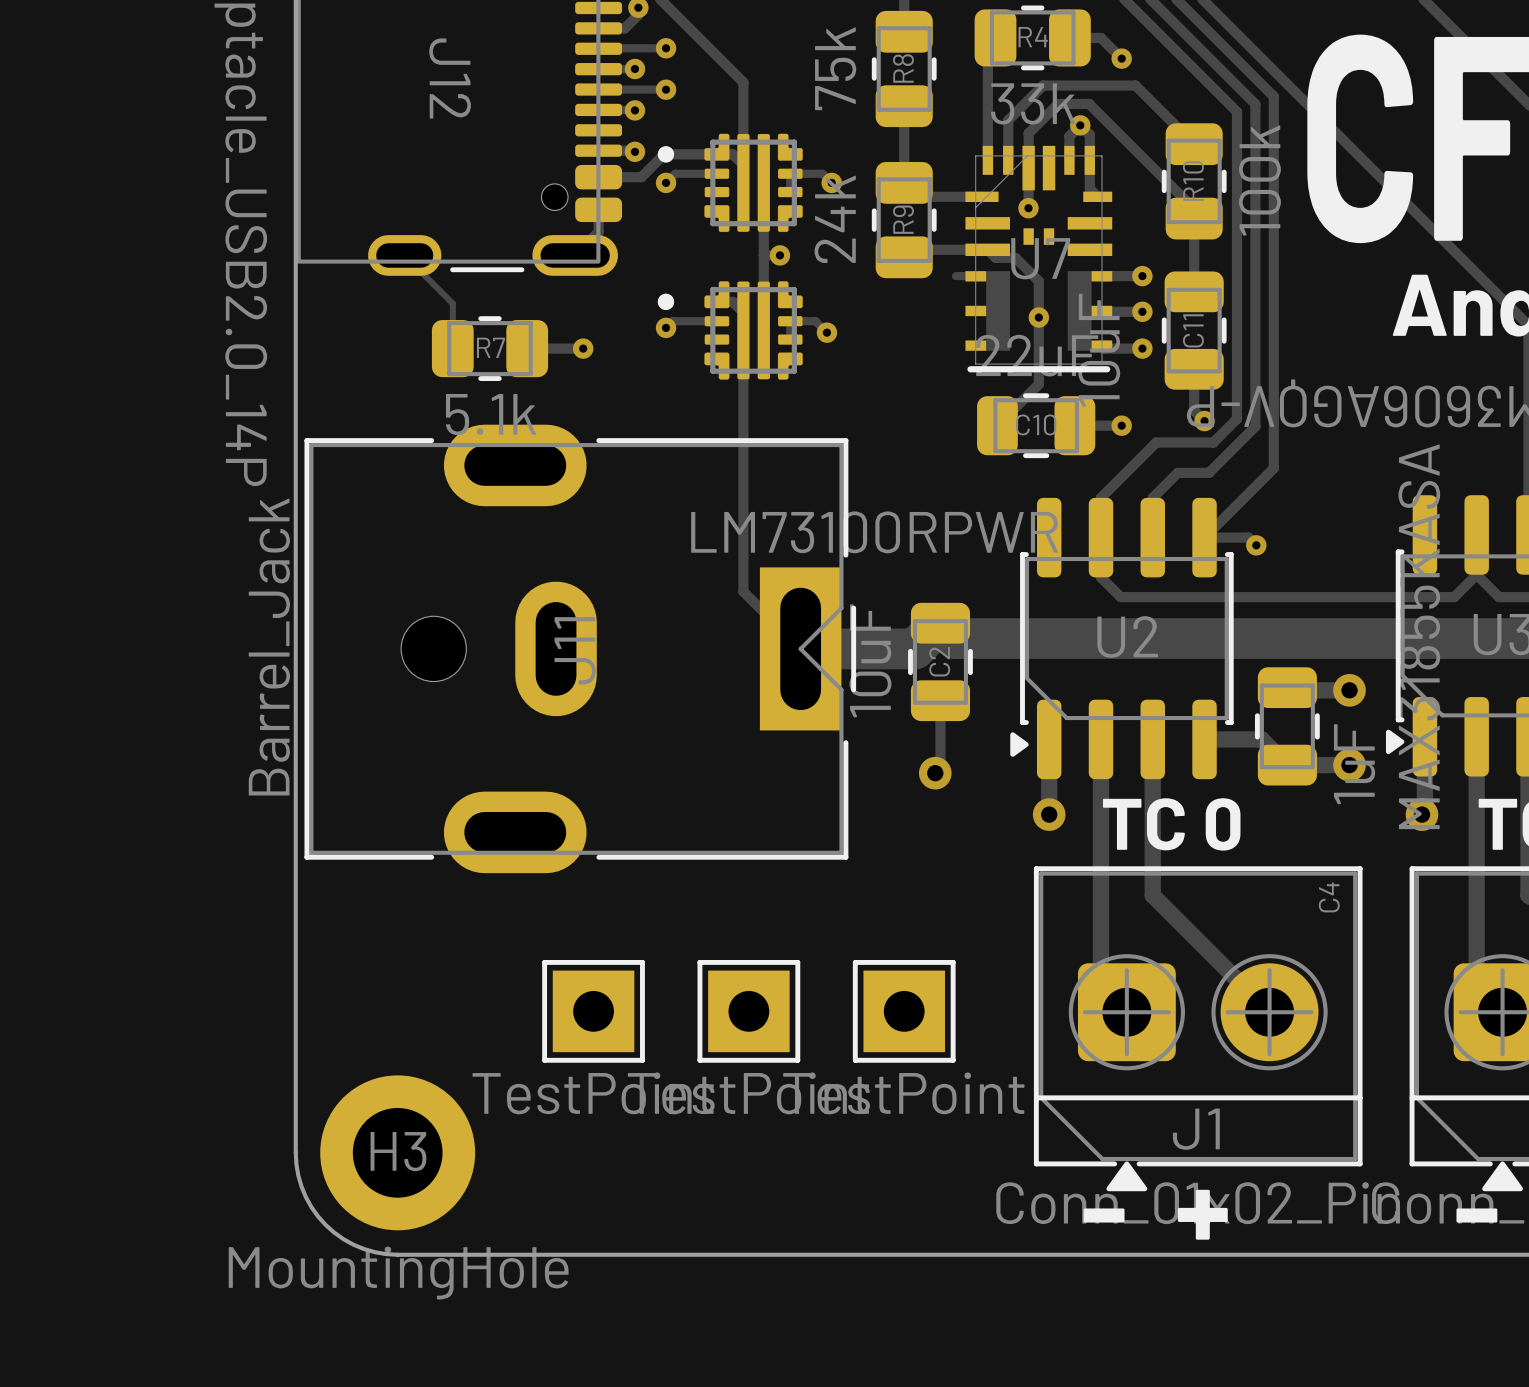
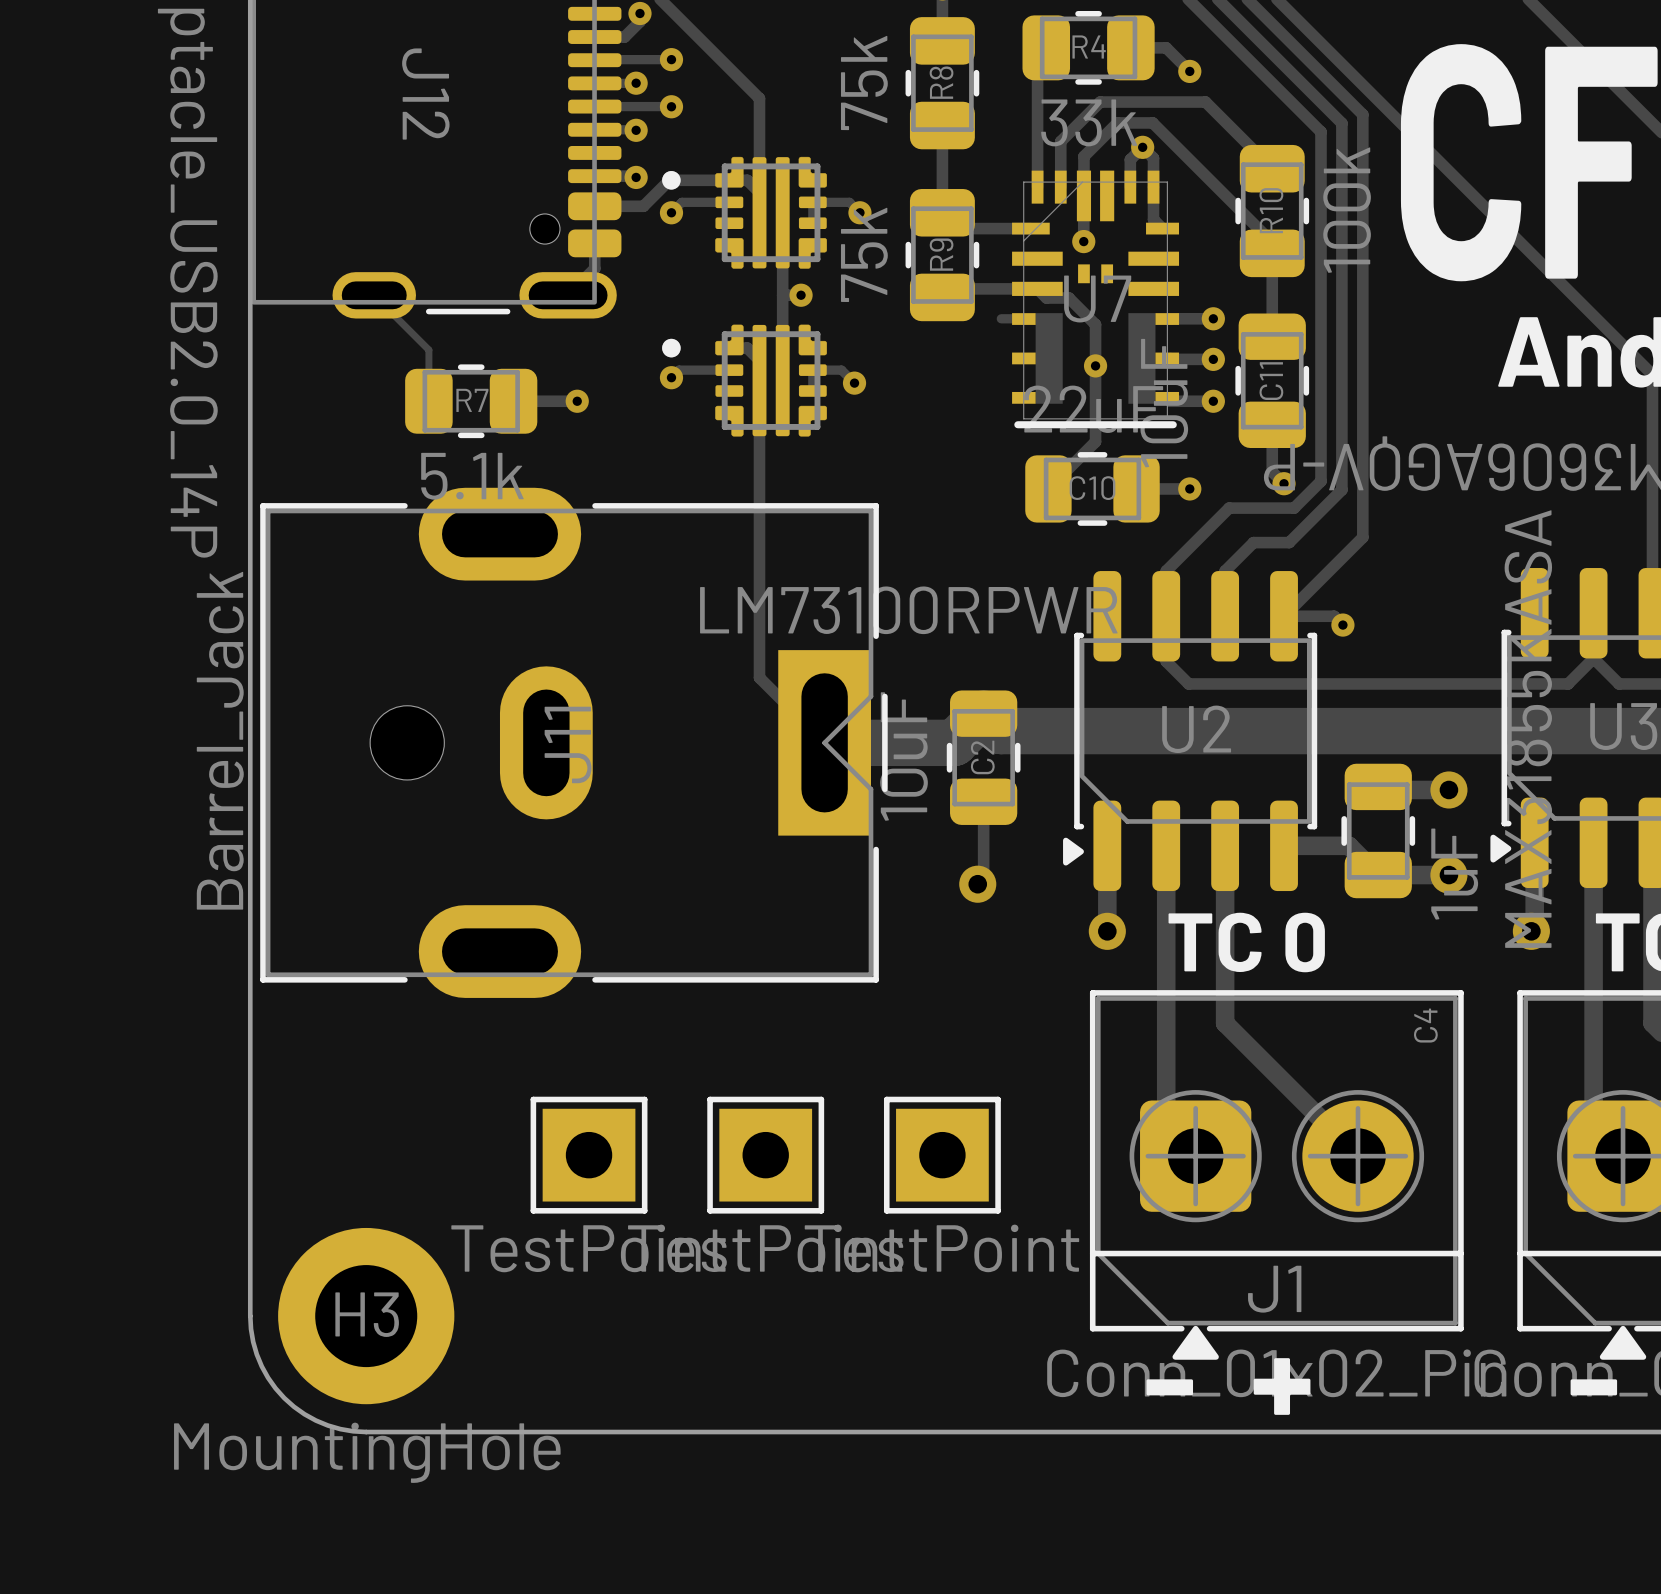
R9 value: 24k (835, 219) -> 75k (864, 254)

